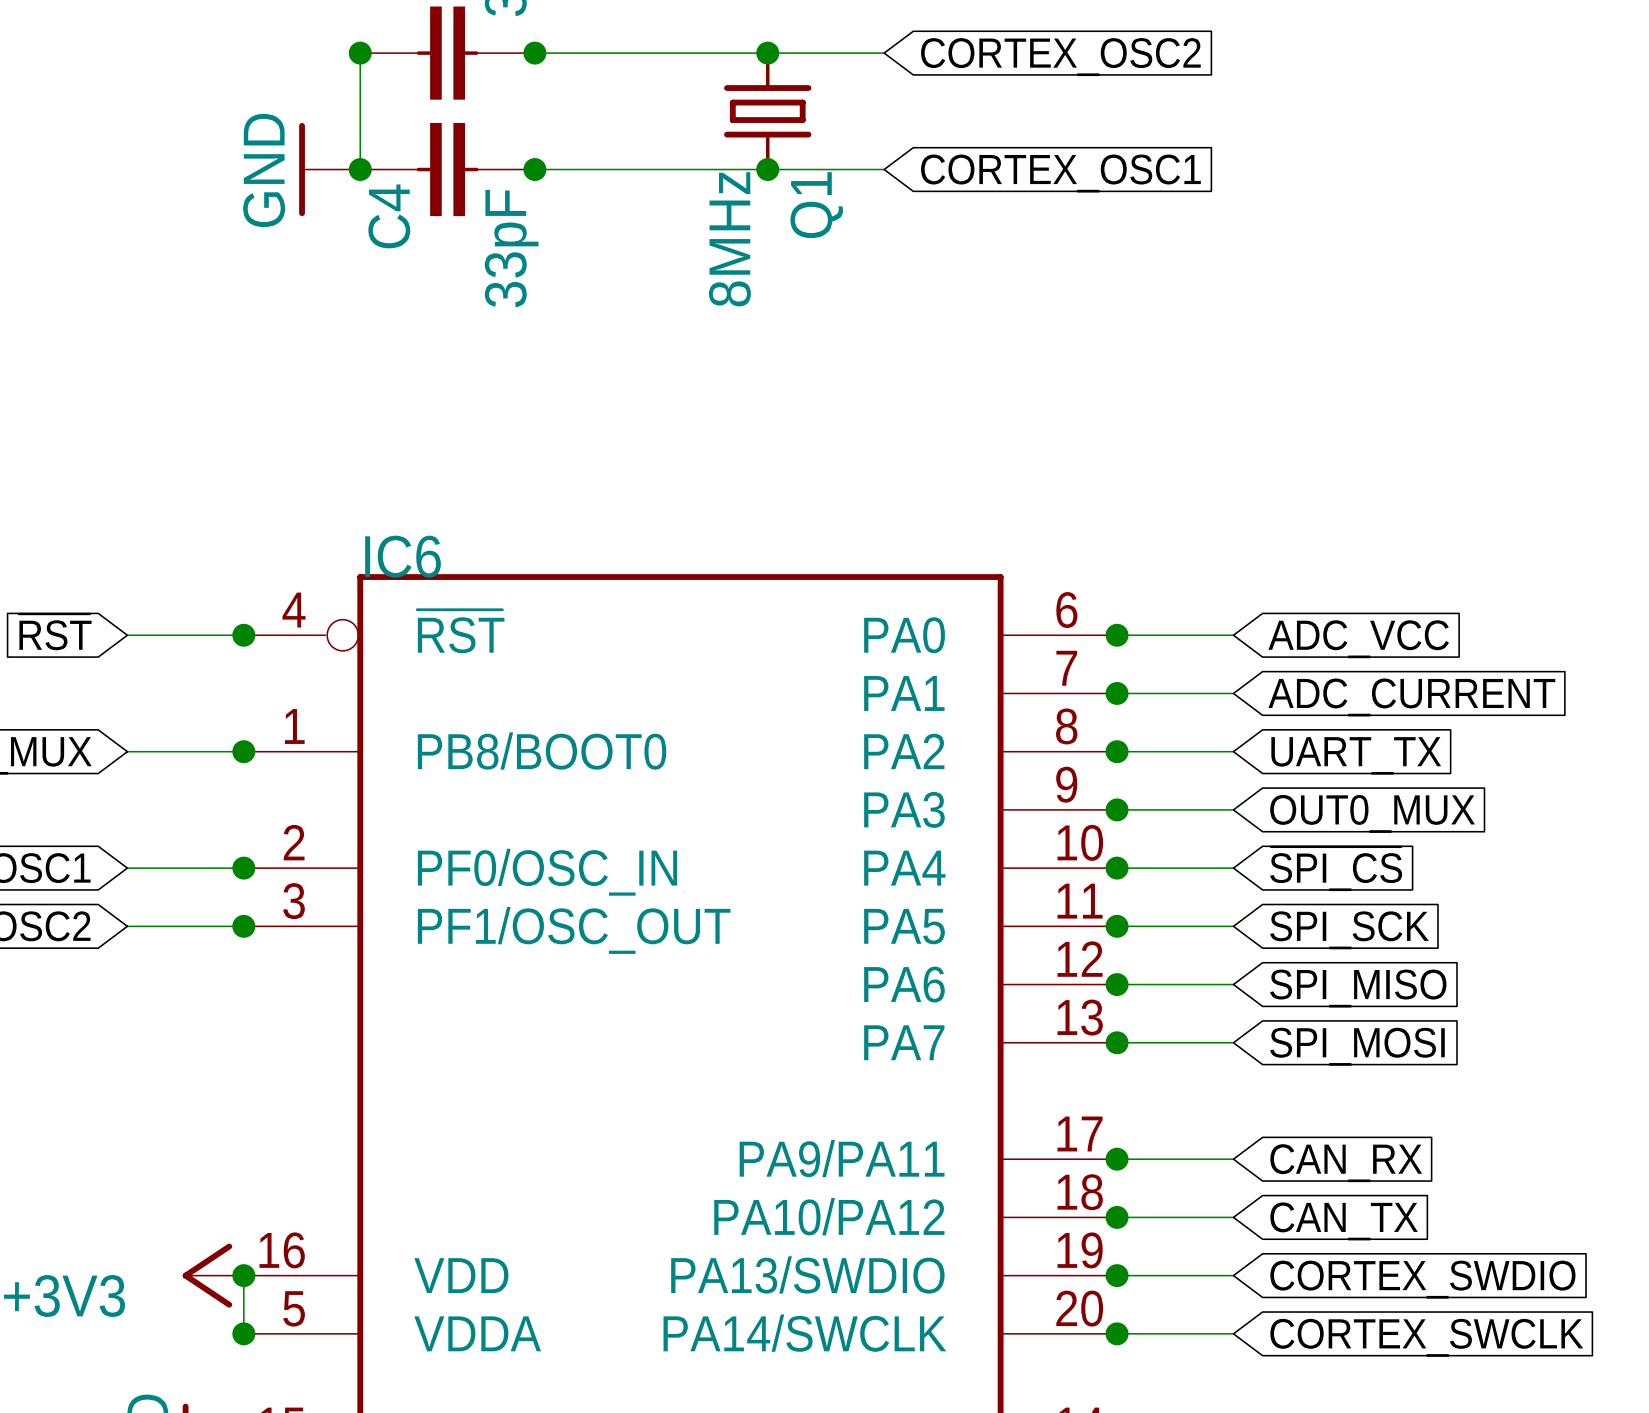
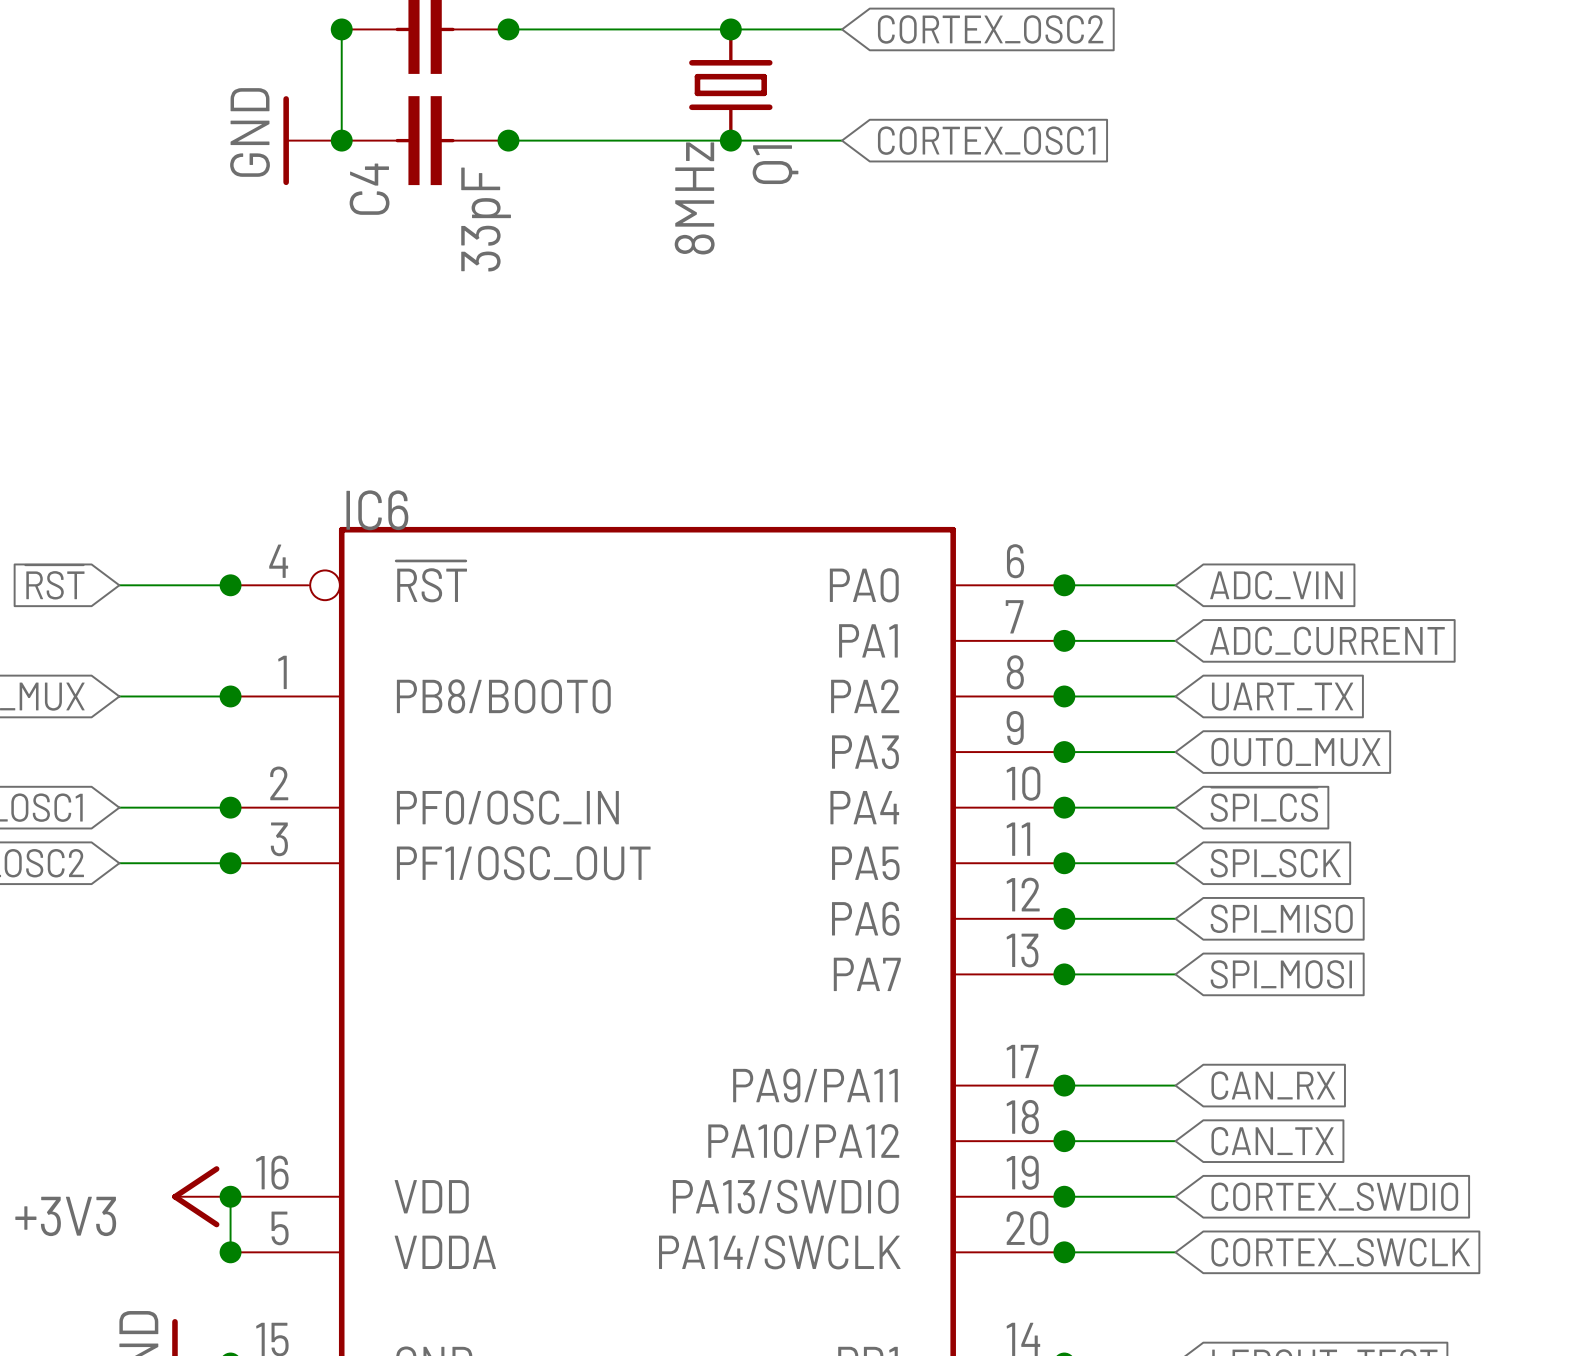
global label: ADC_VCC (1358, 639) -> ADC_VIN (1276, 585)

